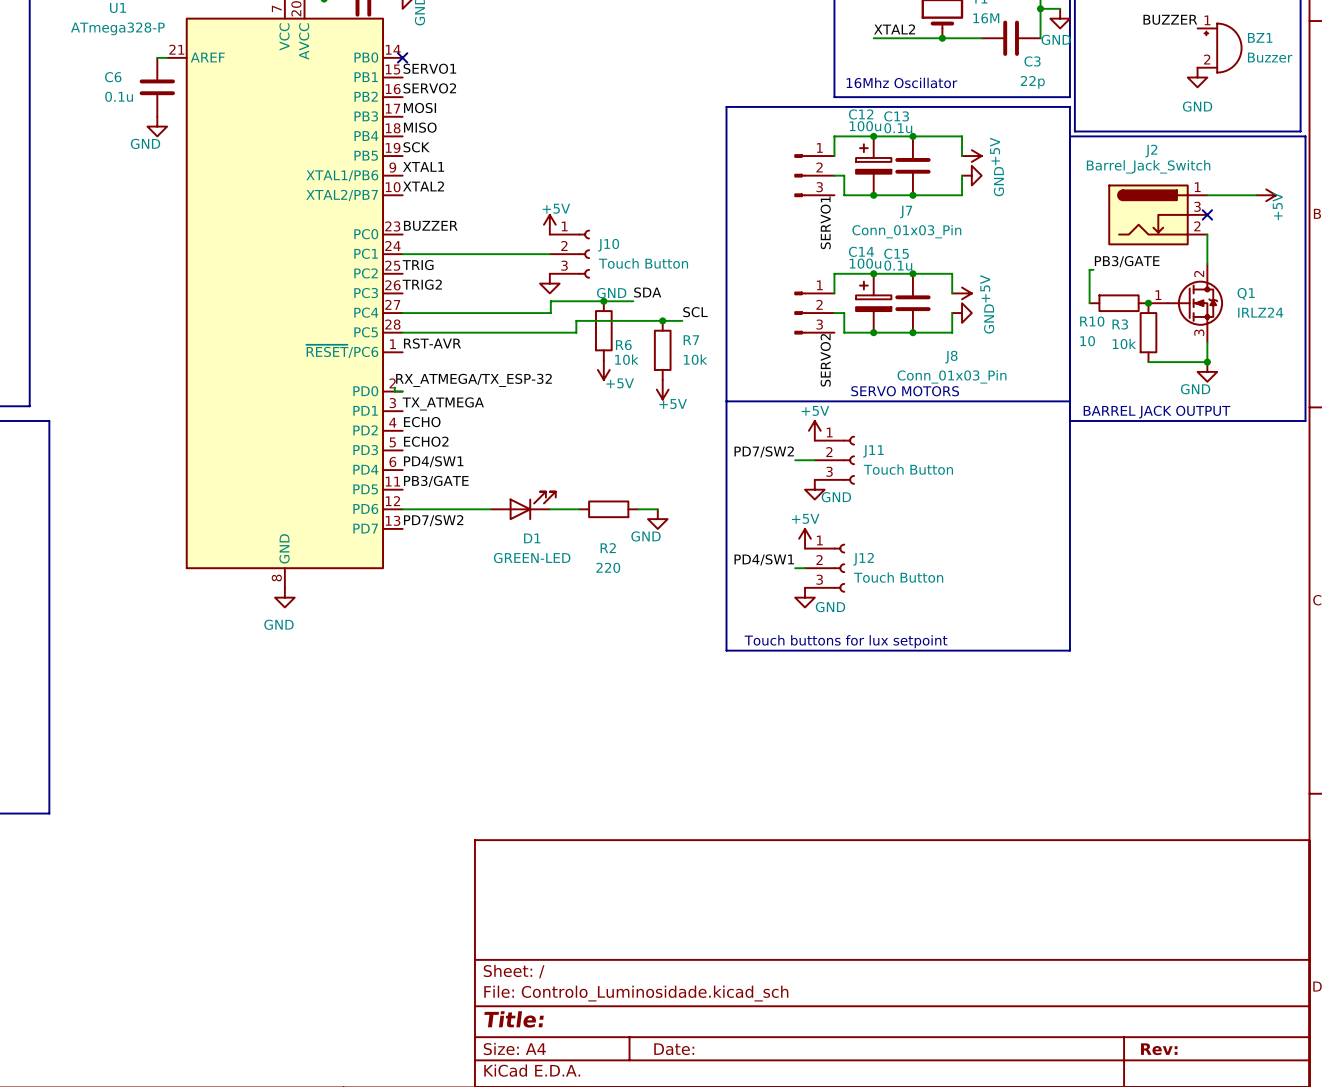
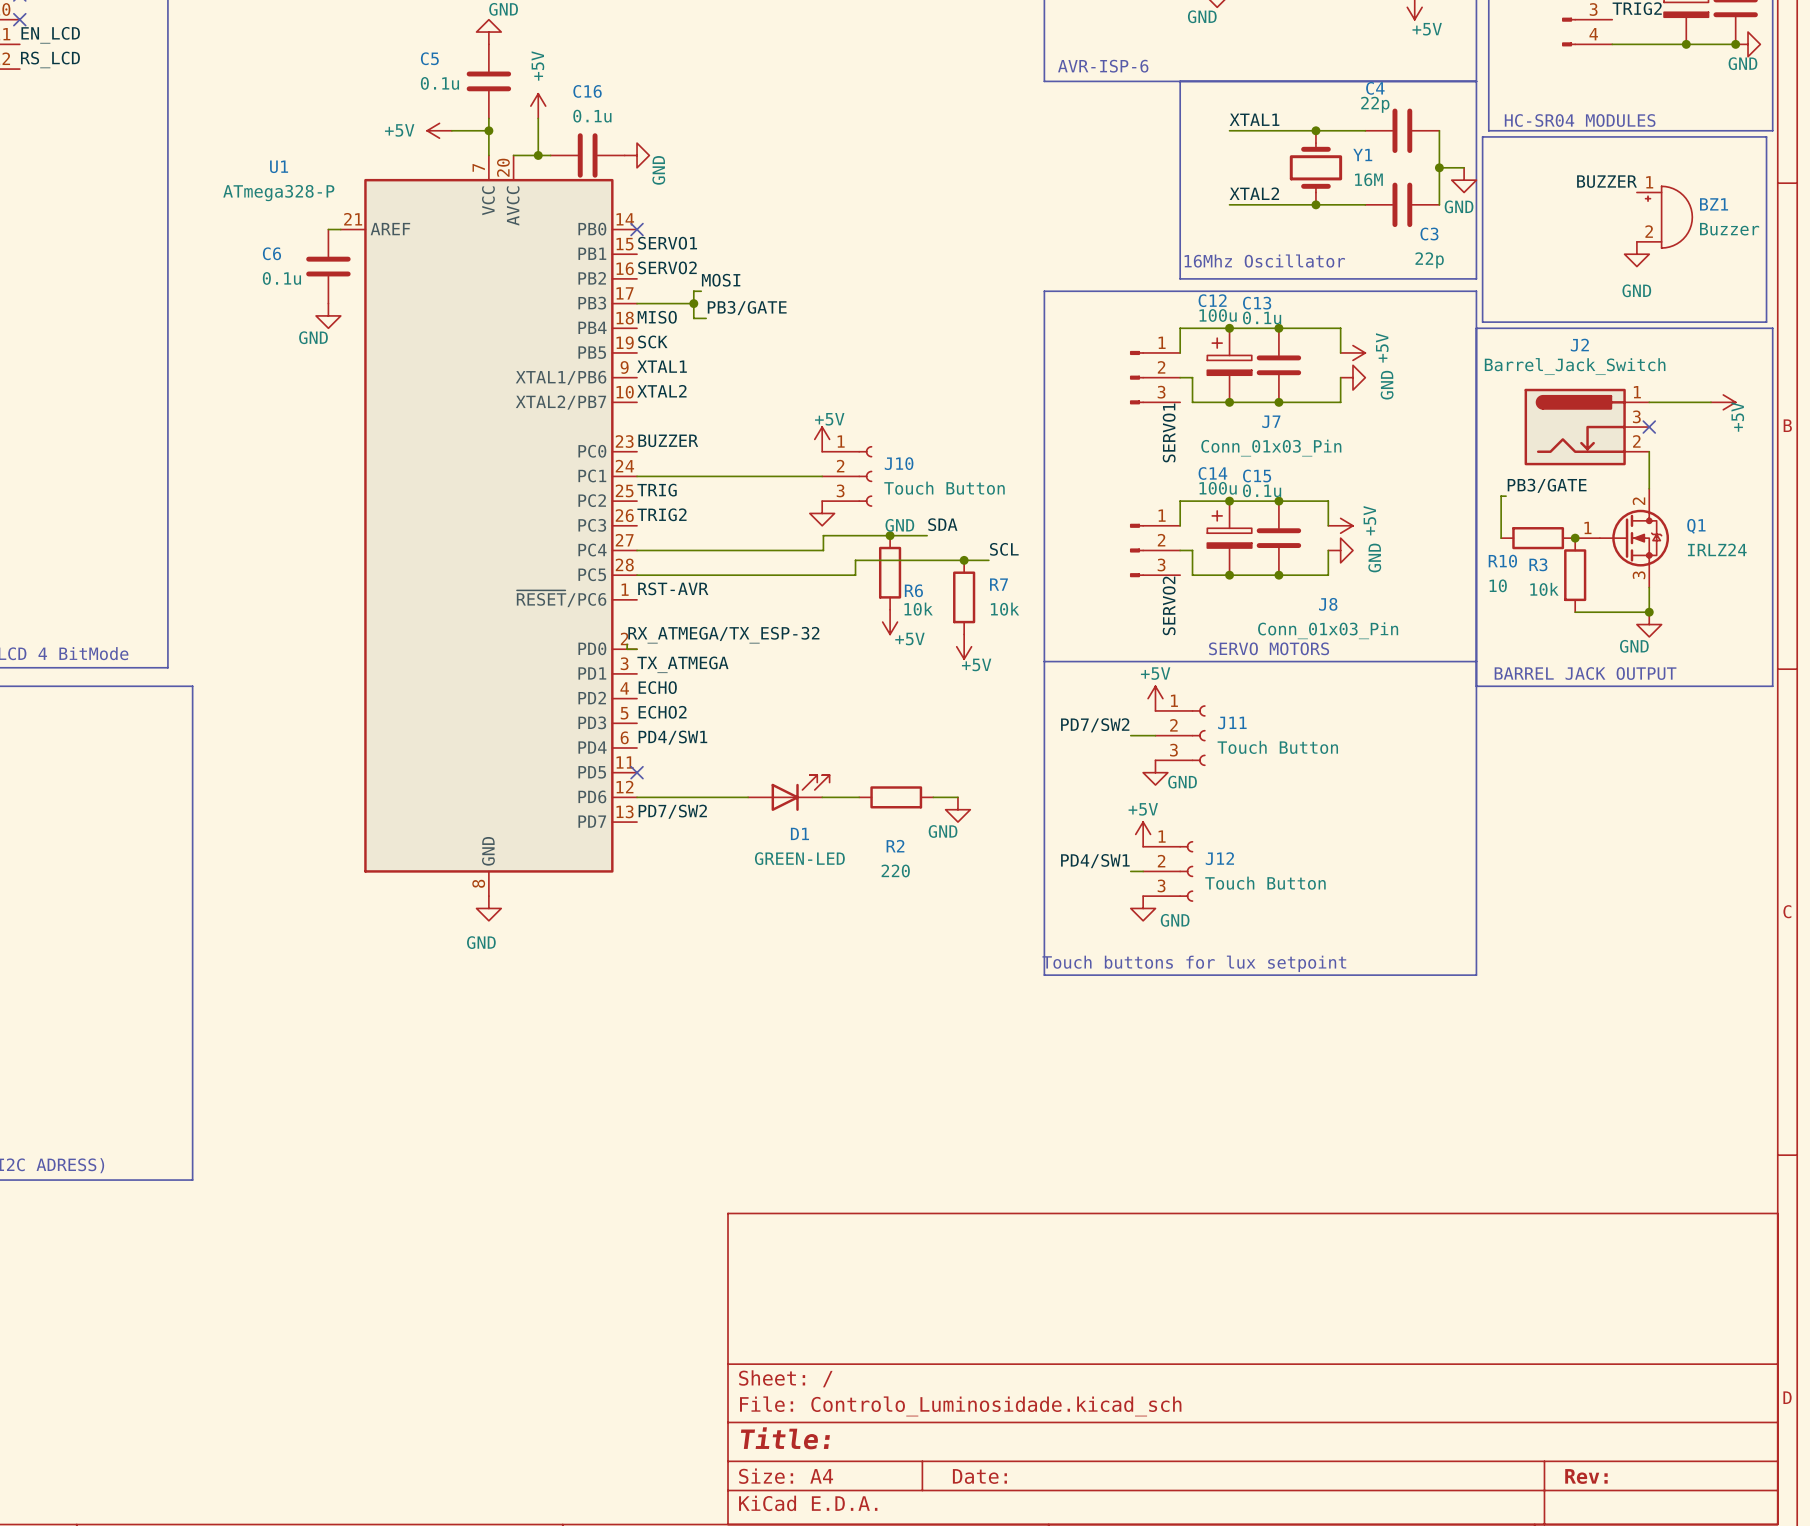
wire: none -> (701, 291) (693, 291) (693, 318) (706, 318)
label position: MOSI (420, 108) -> MOSI (721, 280)
wire: none -> (637, 303) (693, 303)
junction: none -> (693, 303)
label: none -> PB3/GATE (747, 308)
label: PB3/GATE (436, 481) -> none
no-connect mark: none -> (637, 772)

